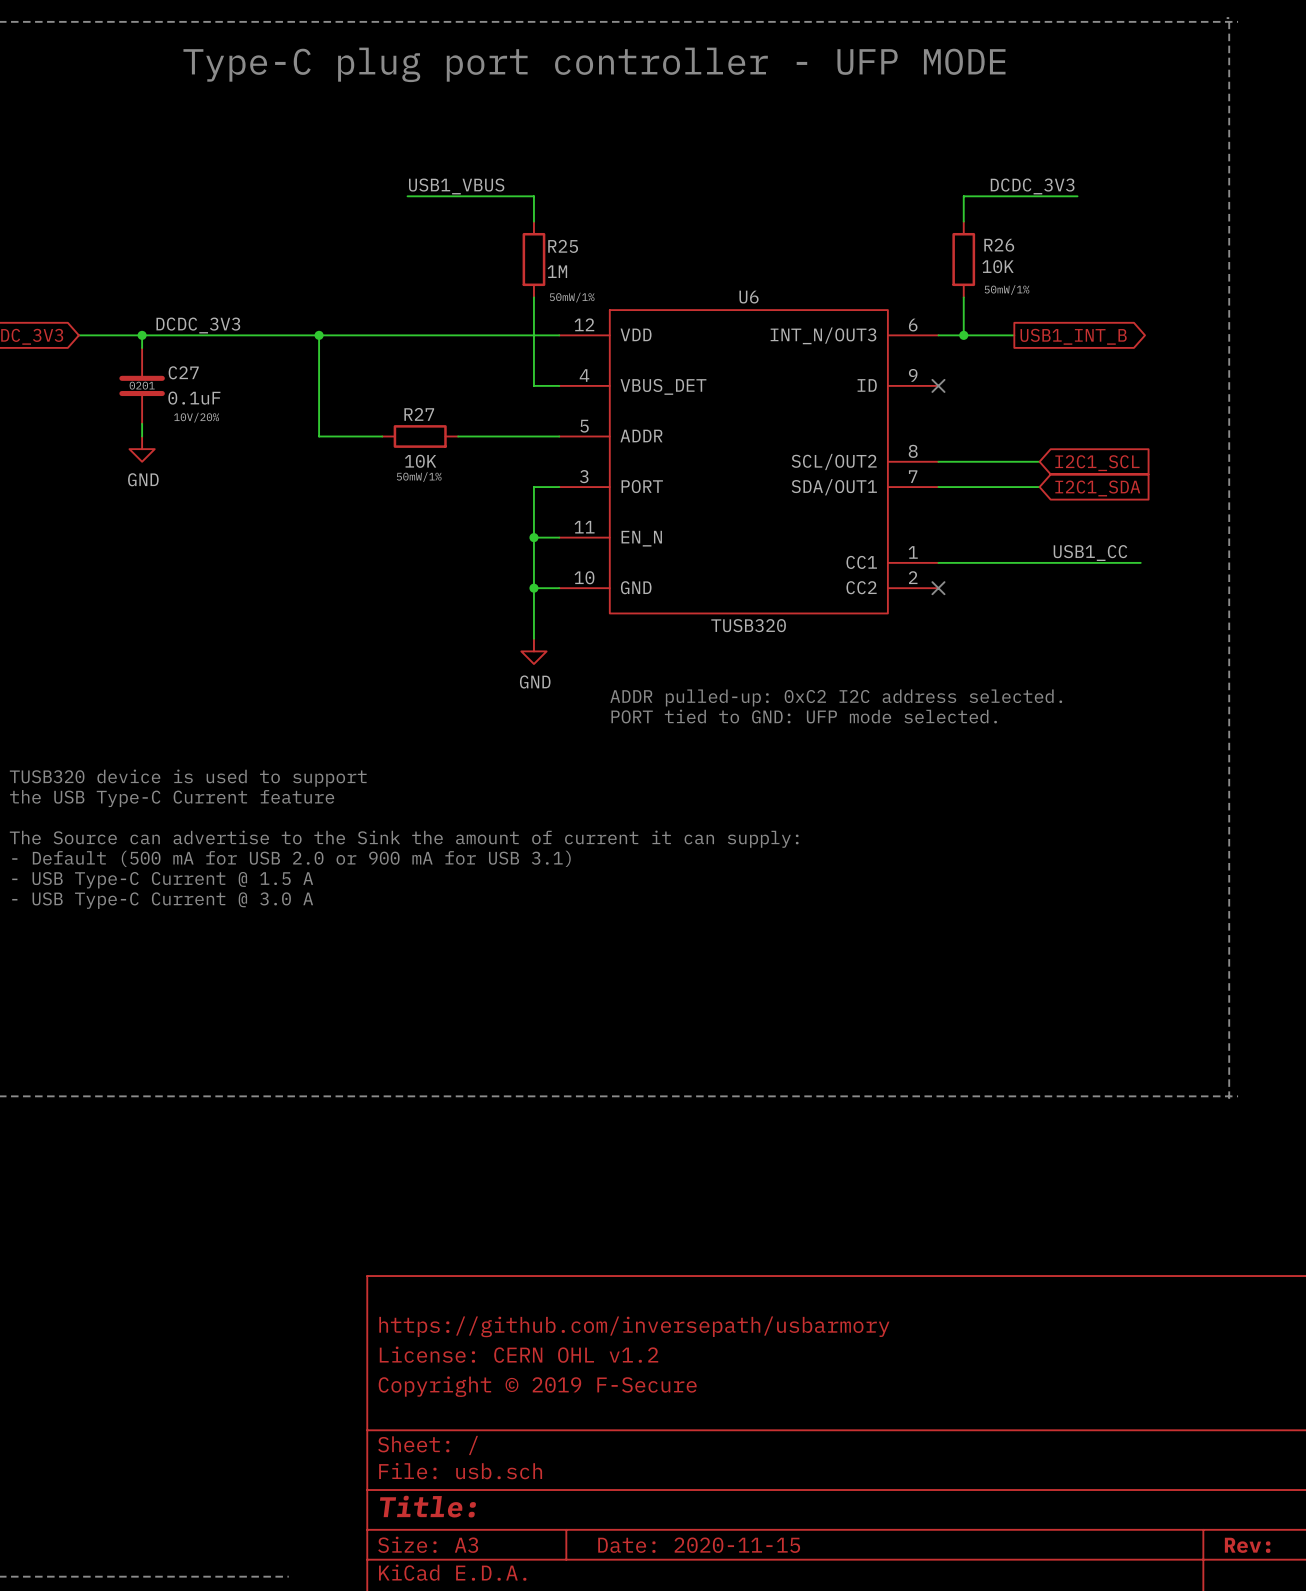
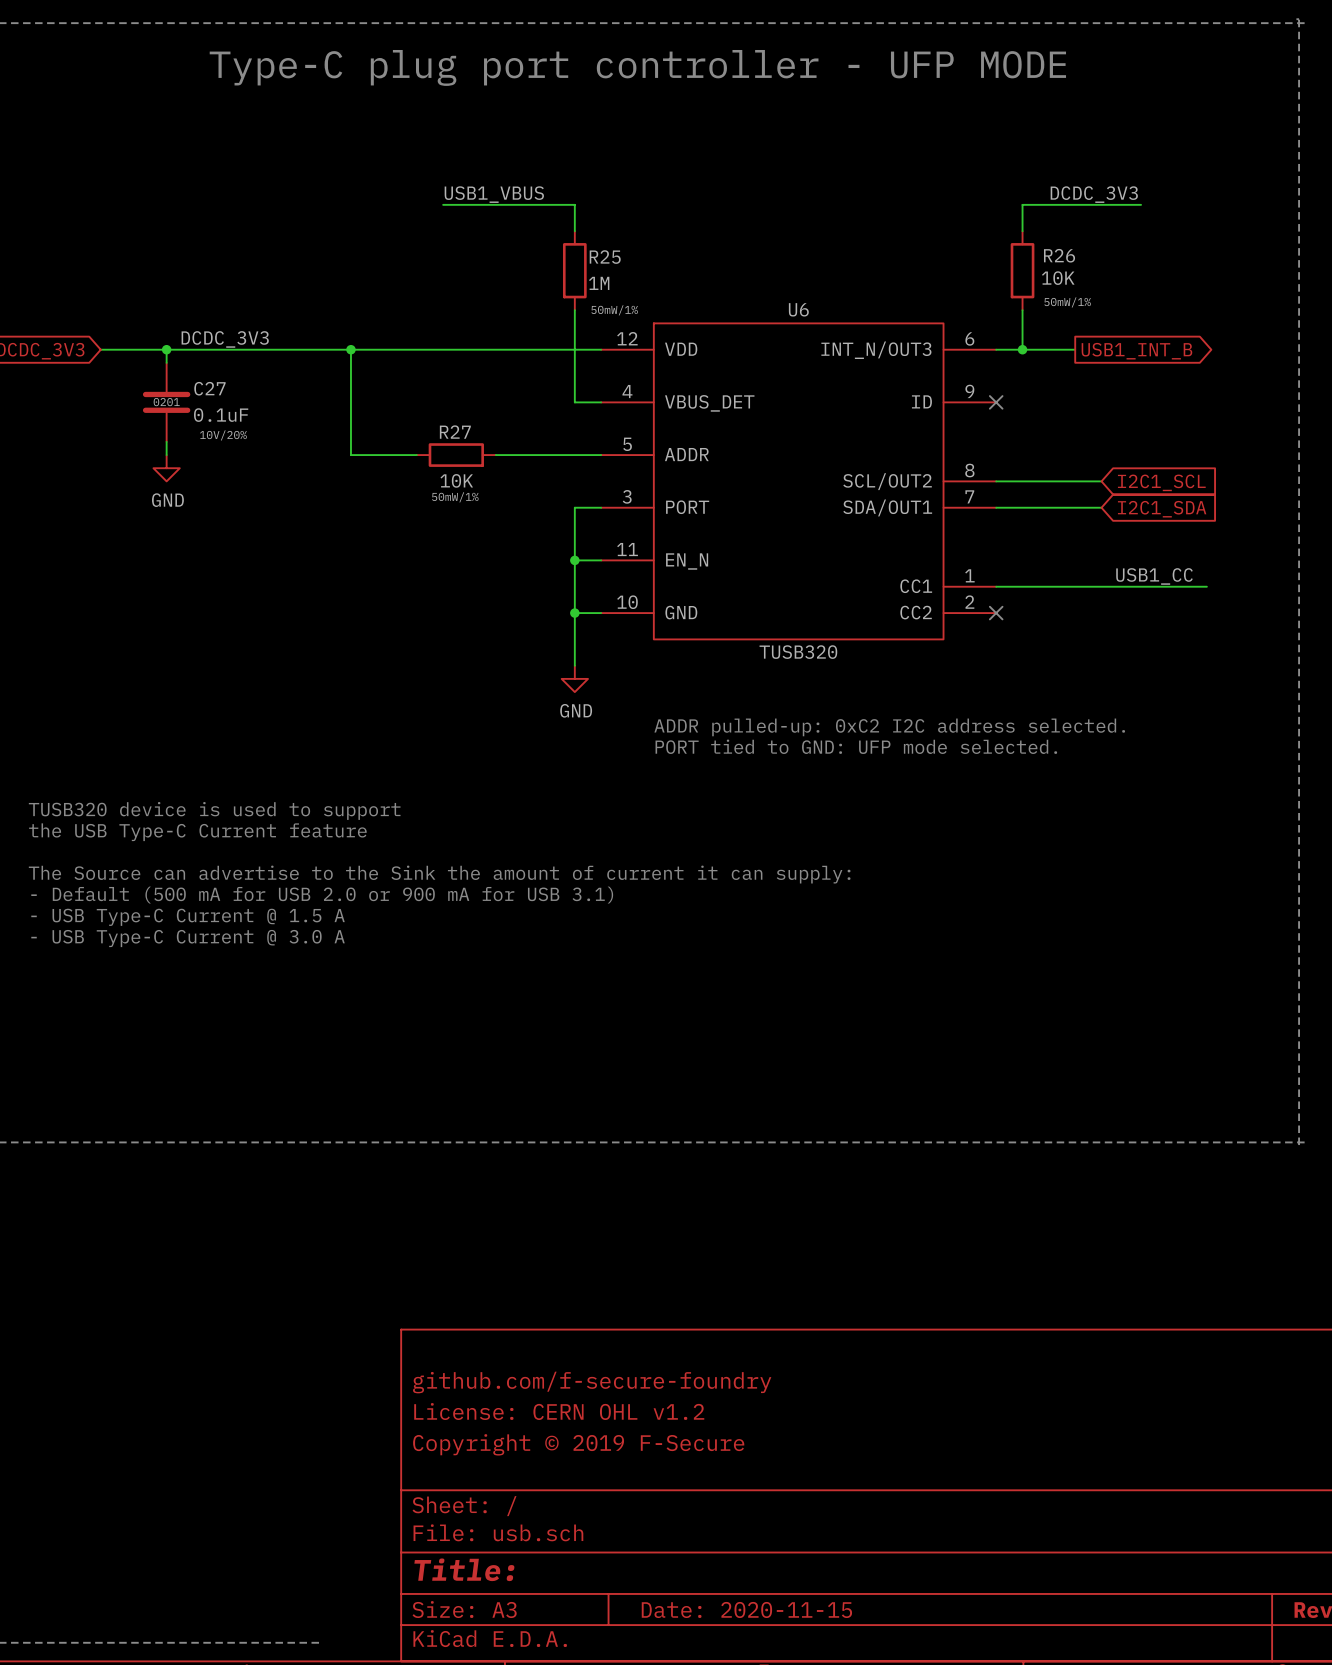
title block: https://github.com/inversepath/usbarmory (634, 1326) -> github.com/f-secure-foundry (592, 1382)

